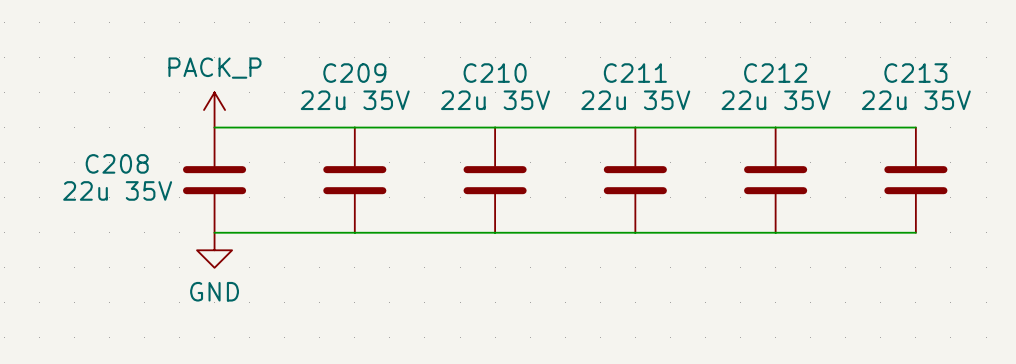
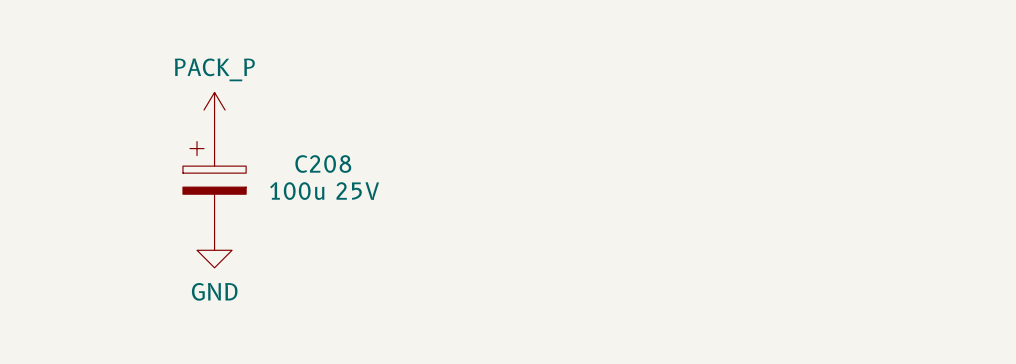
C208 symbol: [182, 127, 247, 233] -> [182, 127, 247, 233]
wire: (214, 127) (915, 127) -> none
C208 name position: C208 (117, 163) -> C208 (323, 164)
C209: 22u 35V (354, 180) -> none
C210: 22u 35V (495, 180) -> none
C211: 22u 35V (635, 180) -> none
C212: 22u 35V (775, 180) -> none
C213: 22u 35V (915, 180) -> none
C208 value: 22u 35V (117, 190) -> 100u 25V (324, 191)
wire: (214, 232) (915, 232) -> none

